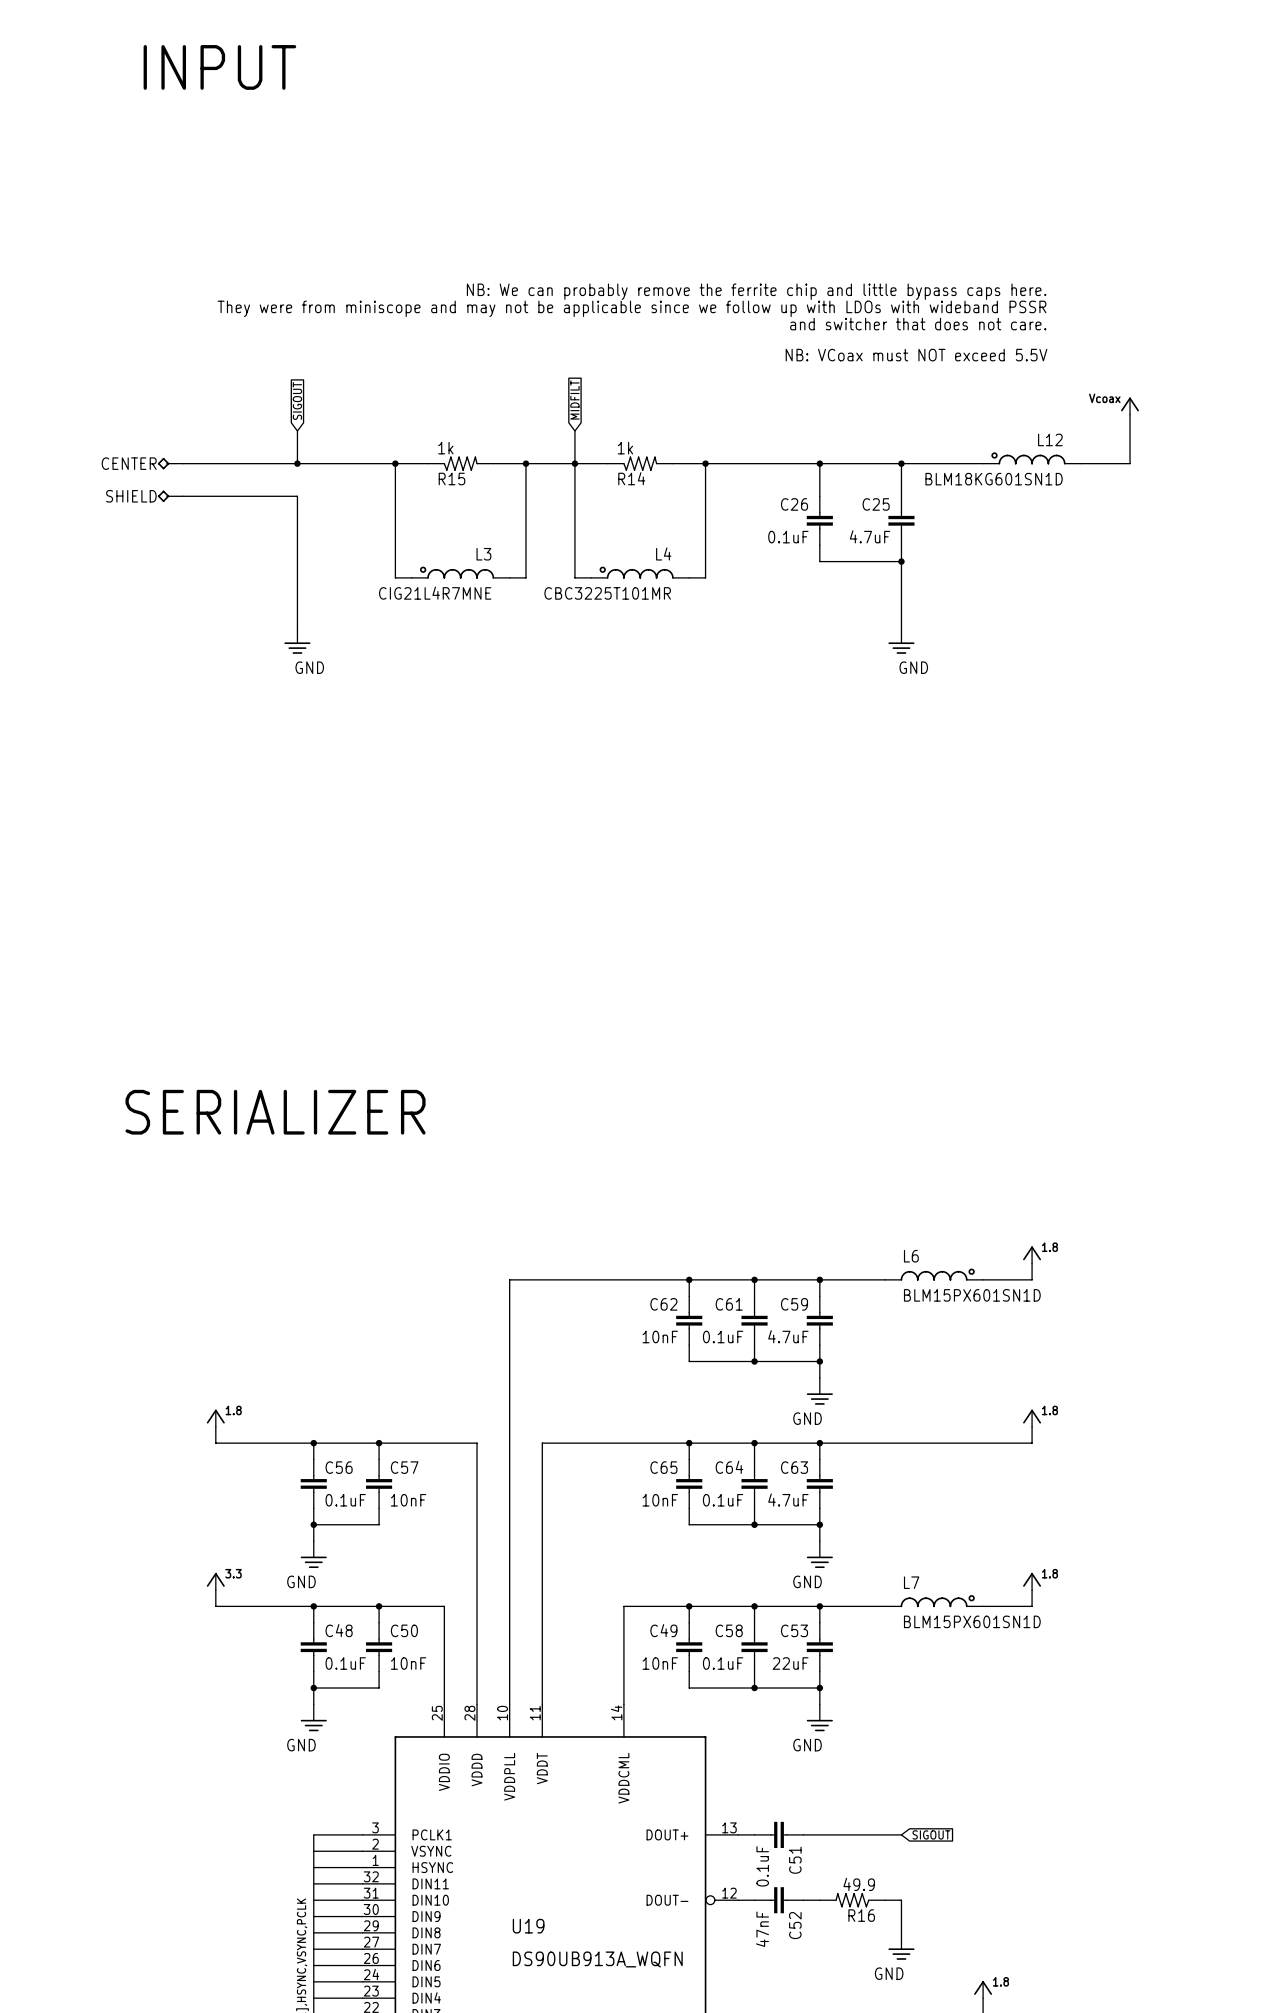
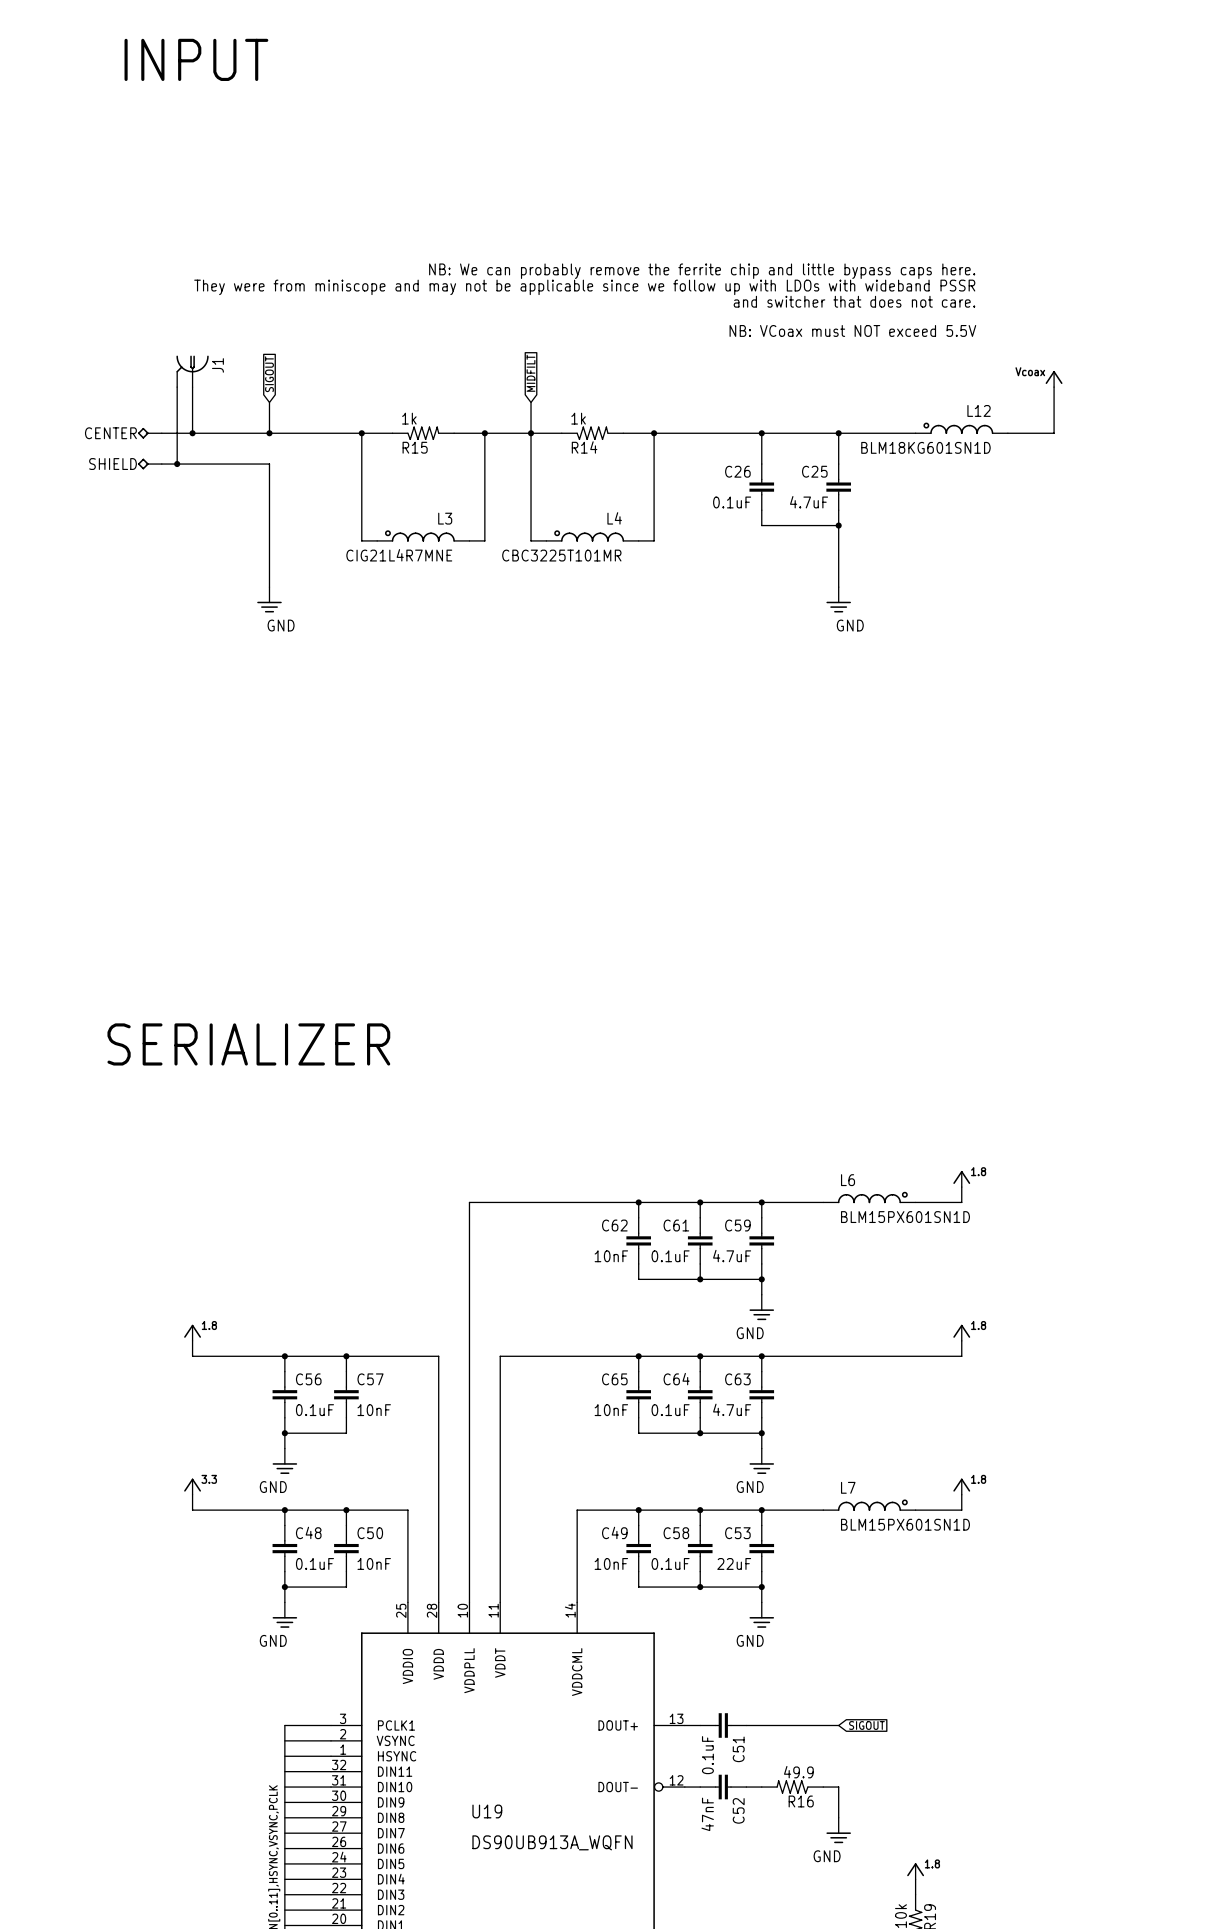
J1: none -> (192, 371)
wire: none -> (177, 387) (177, 464)
wire: none -> (192, 387) (192, 433)
junction: none -> (192, 433)
junction: none -> (177, 464)

